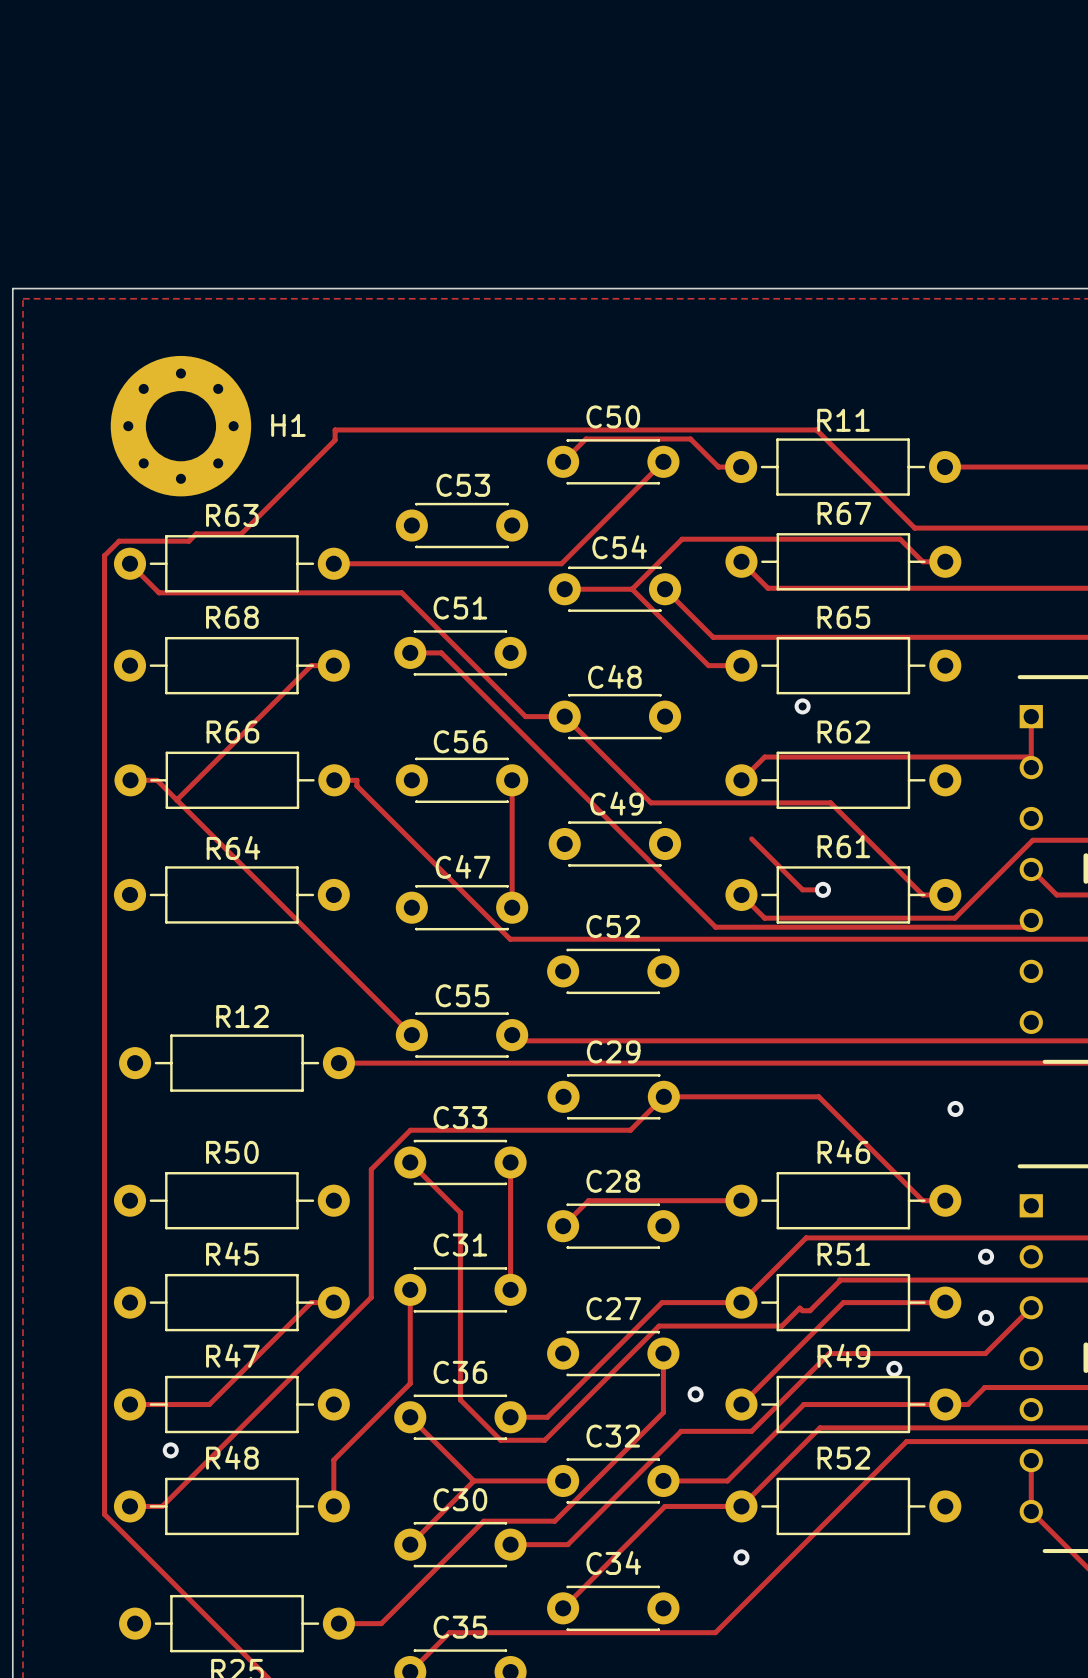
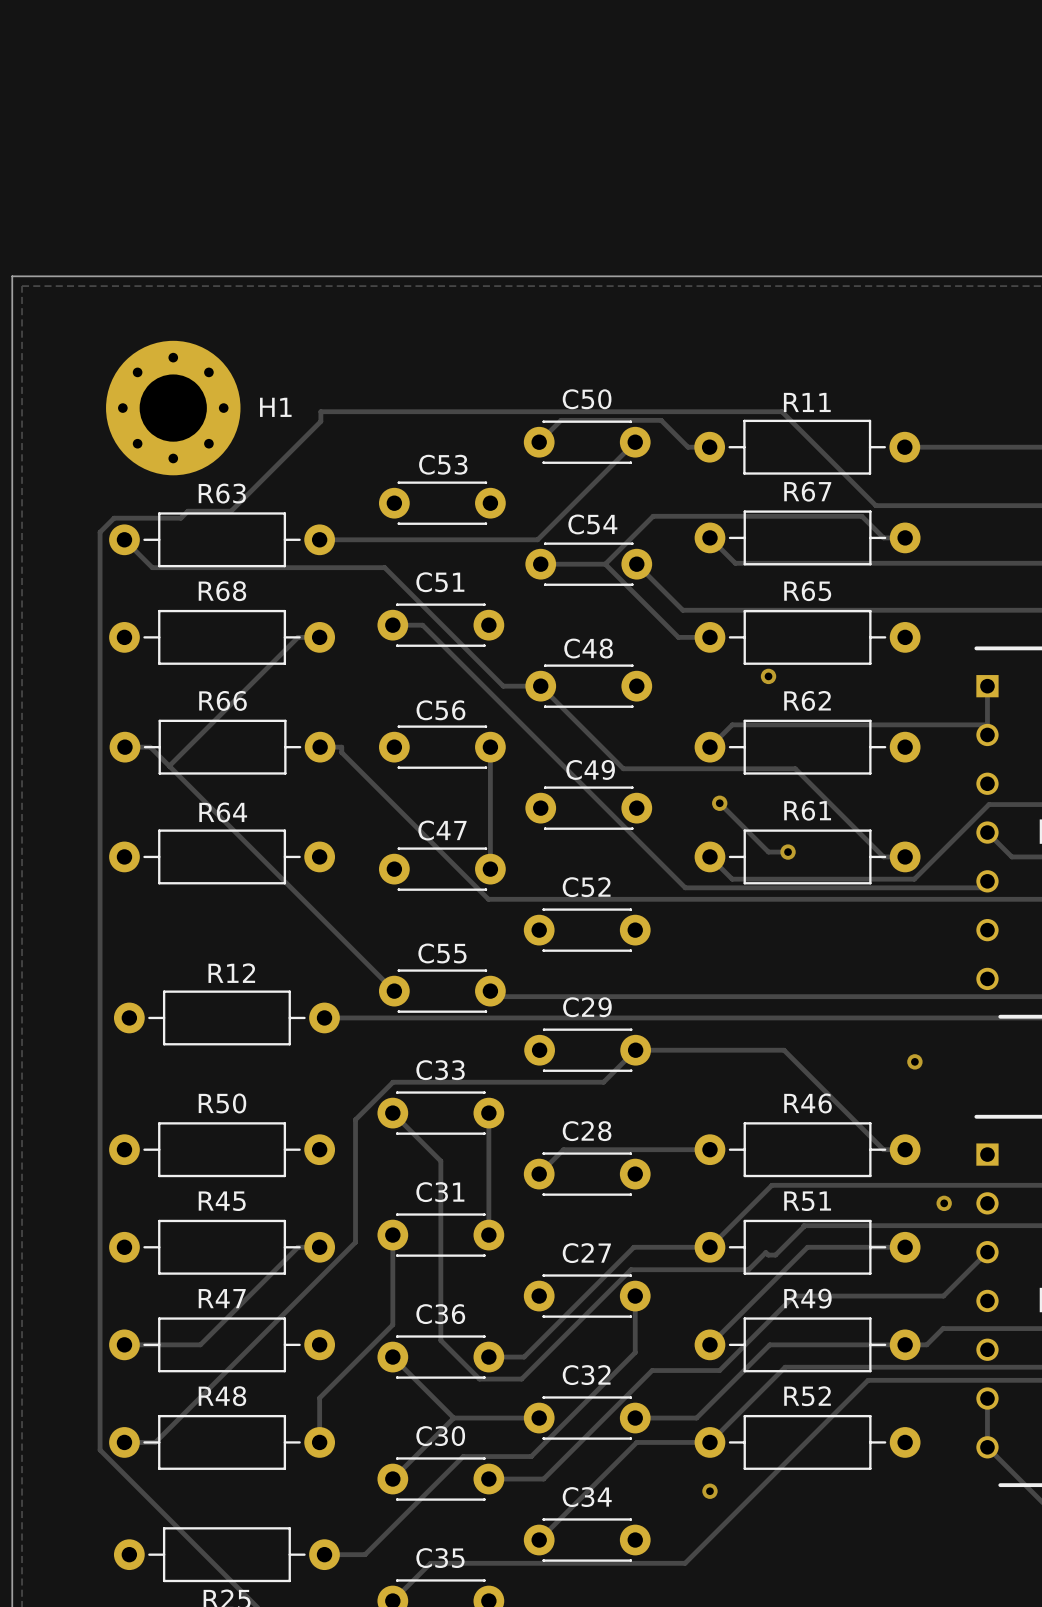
via: none -> (719, 803)
via: (986, 1317) -> none
via: (894, 1368) -> none
via: (695, 1394) -> none
via: (170, 1450) -> none

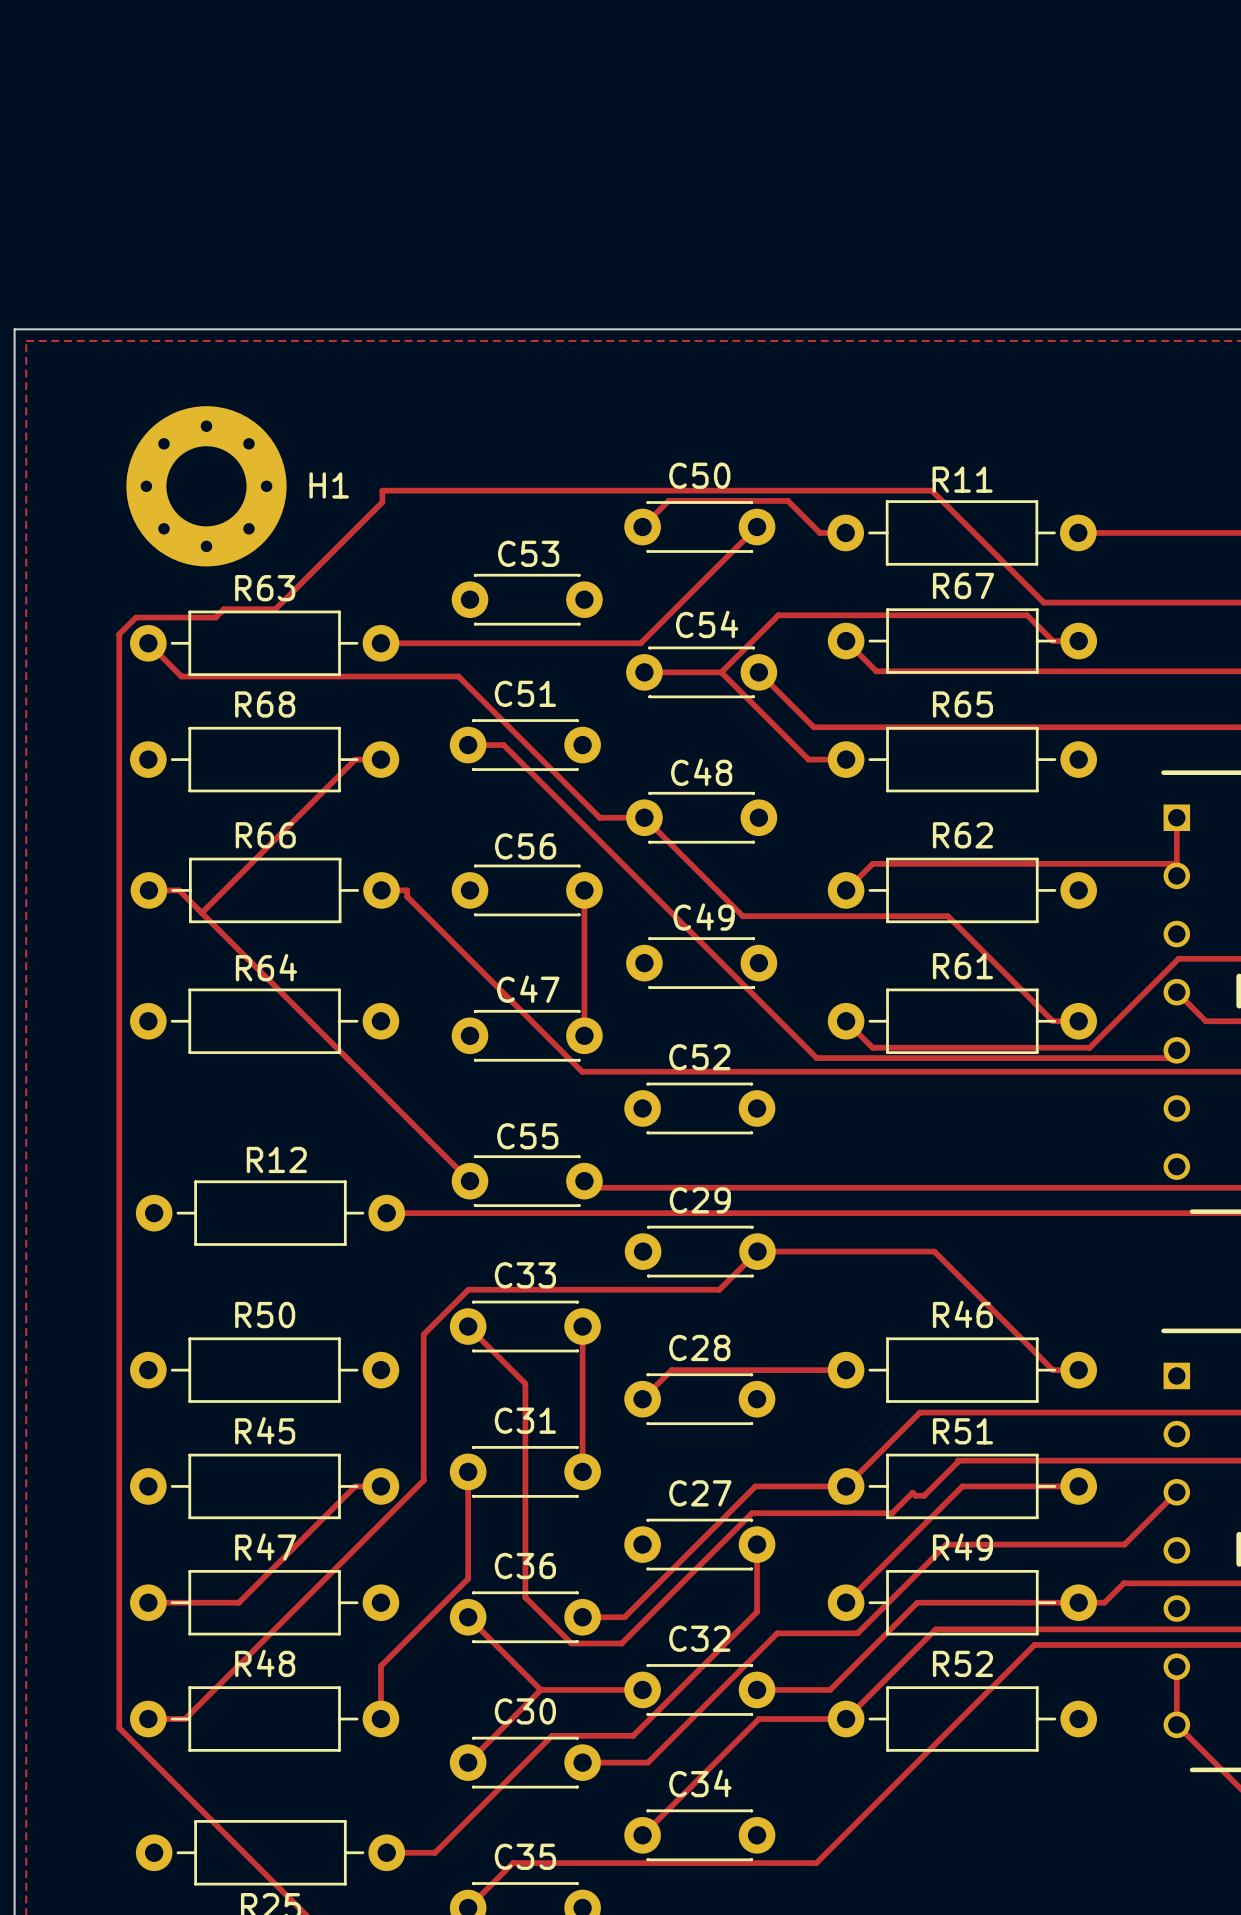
via: (768, 676) -> none
track: (719, 803) (768, 852) (788, 852) -> none
via: (719, 803) -> none
via: (788, 852) -> none
via: (914, 1061) -> none
via: (944, 1203) -> none
via: (709, 1491) -> none

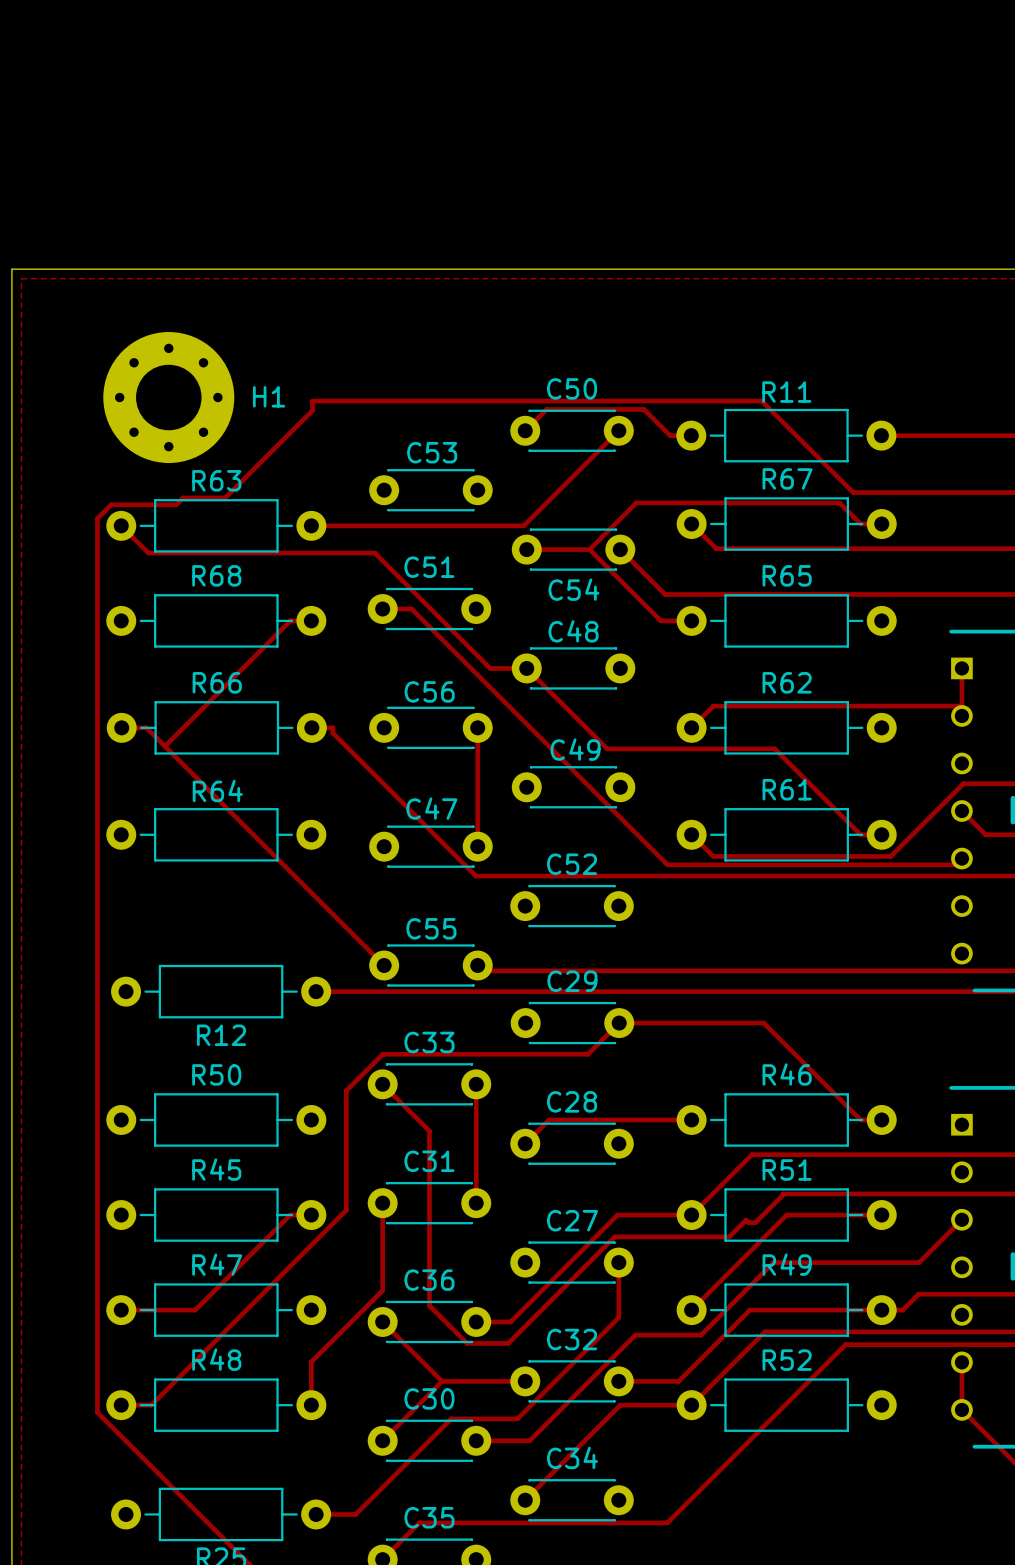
C54 name position: C54 (707, 624) -> C54 (573, 589)
R12 name position: R12 (276, 1159) -> R12 (221, 1035)

